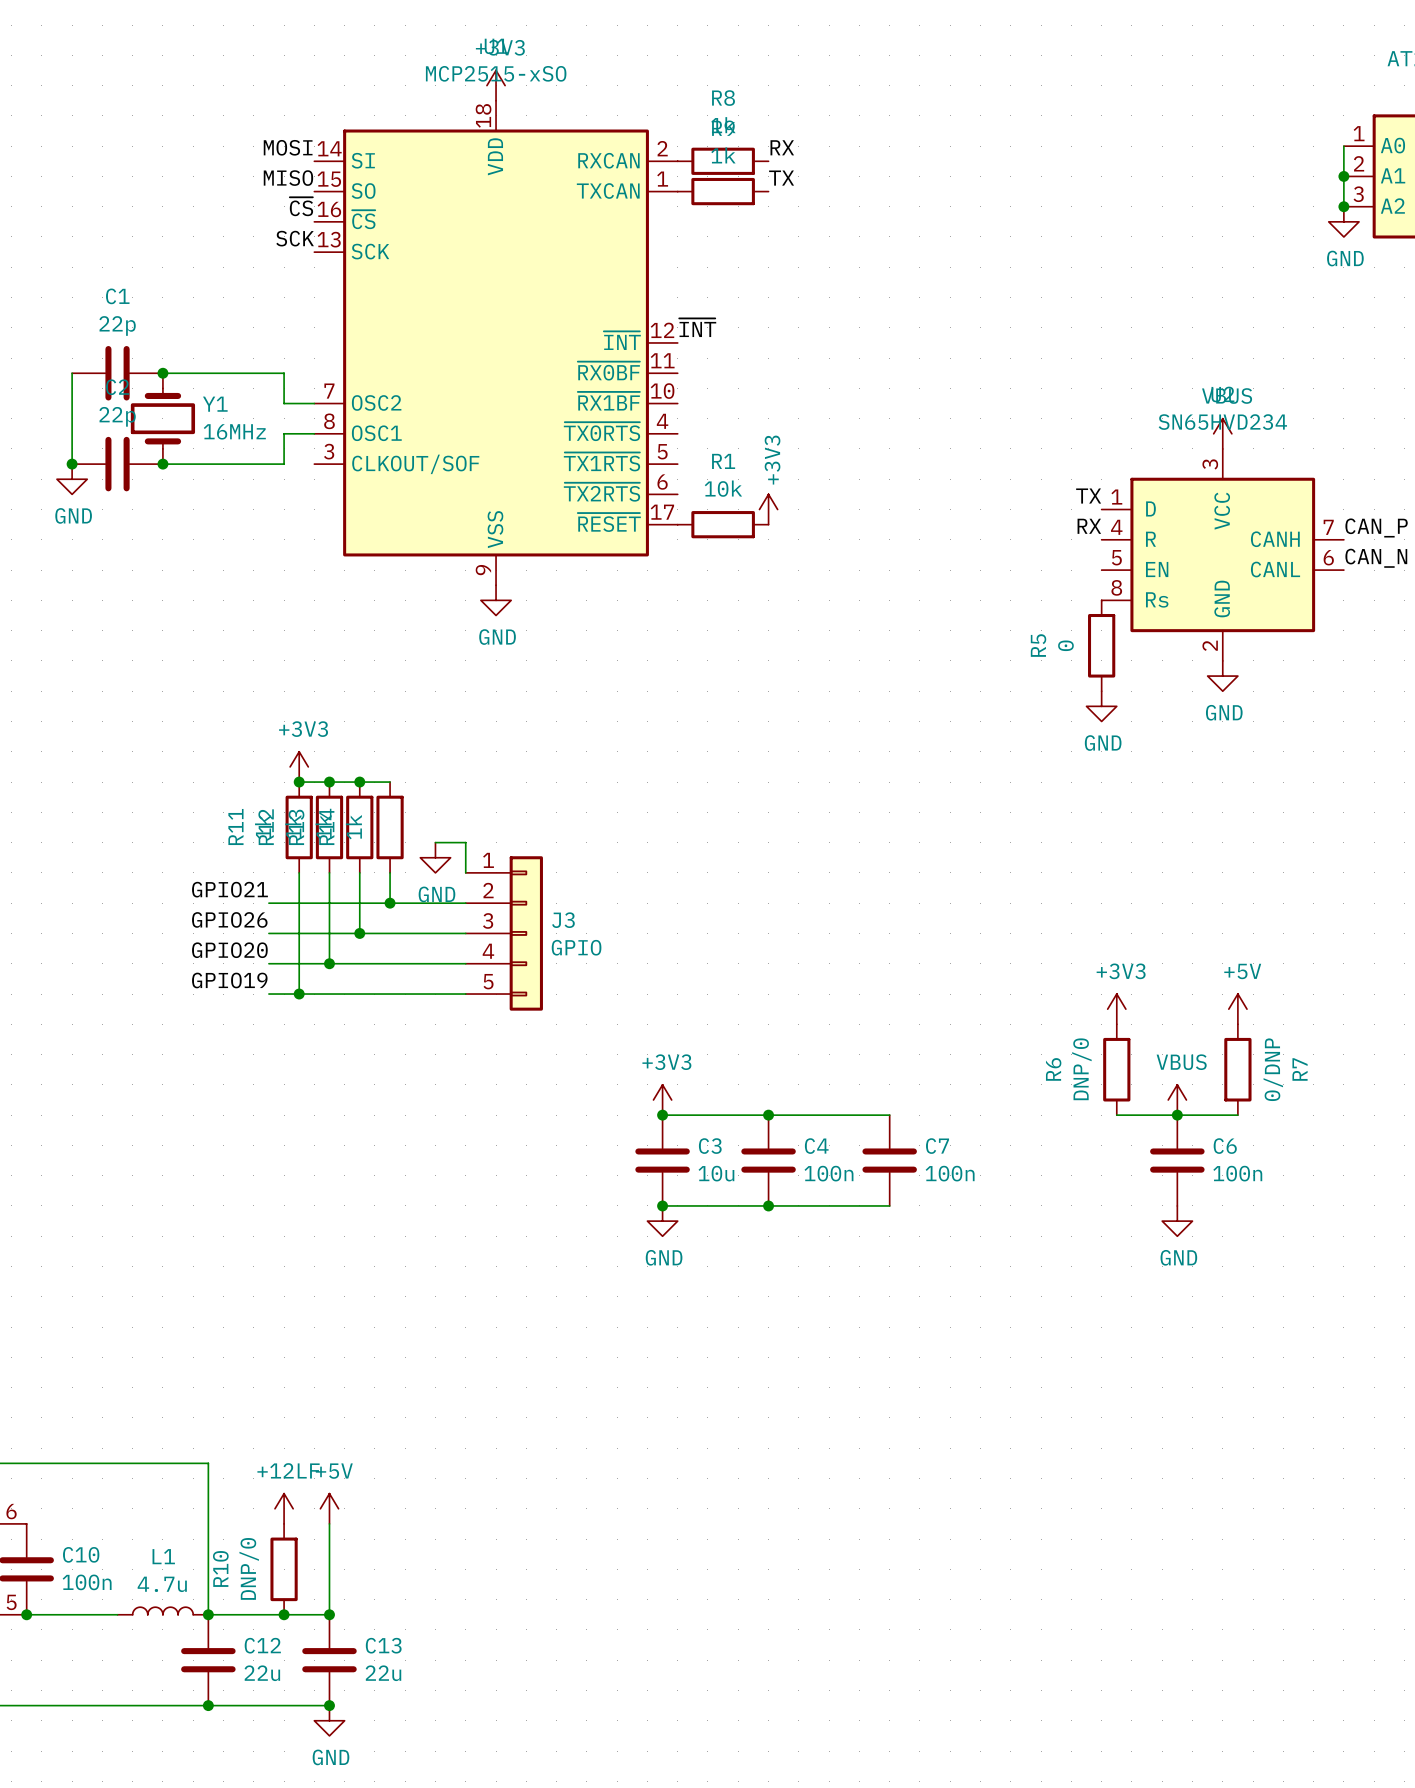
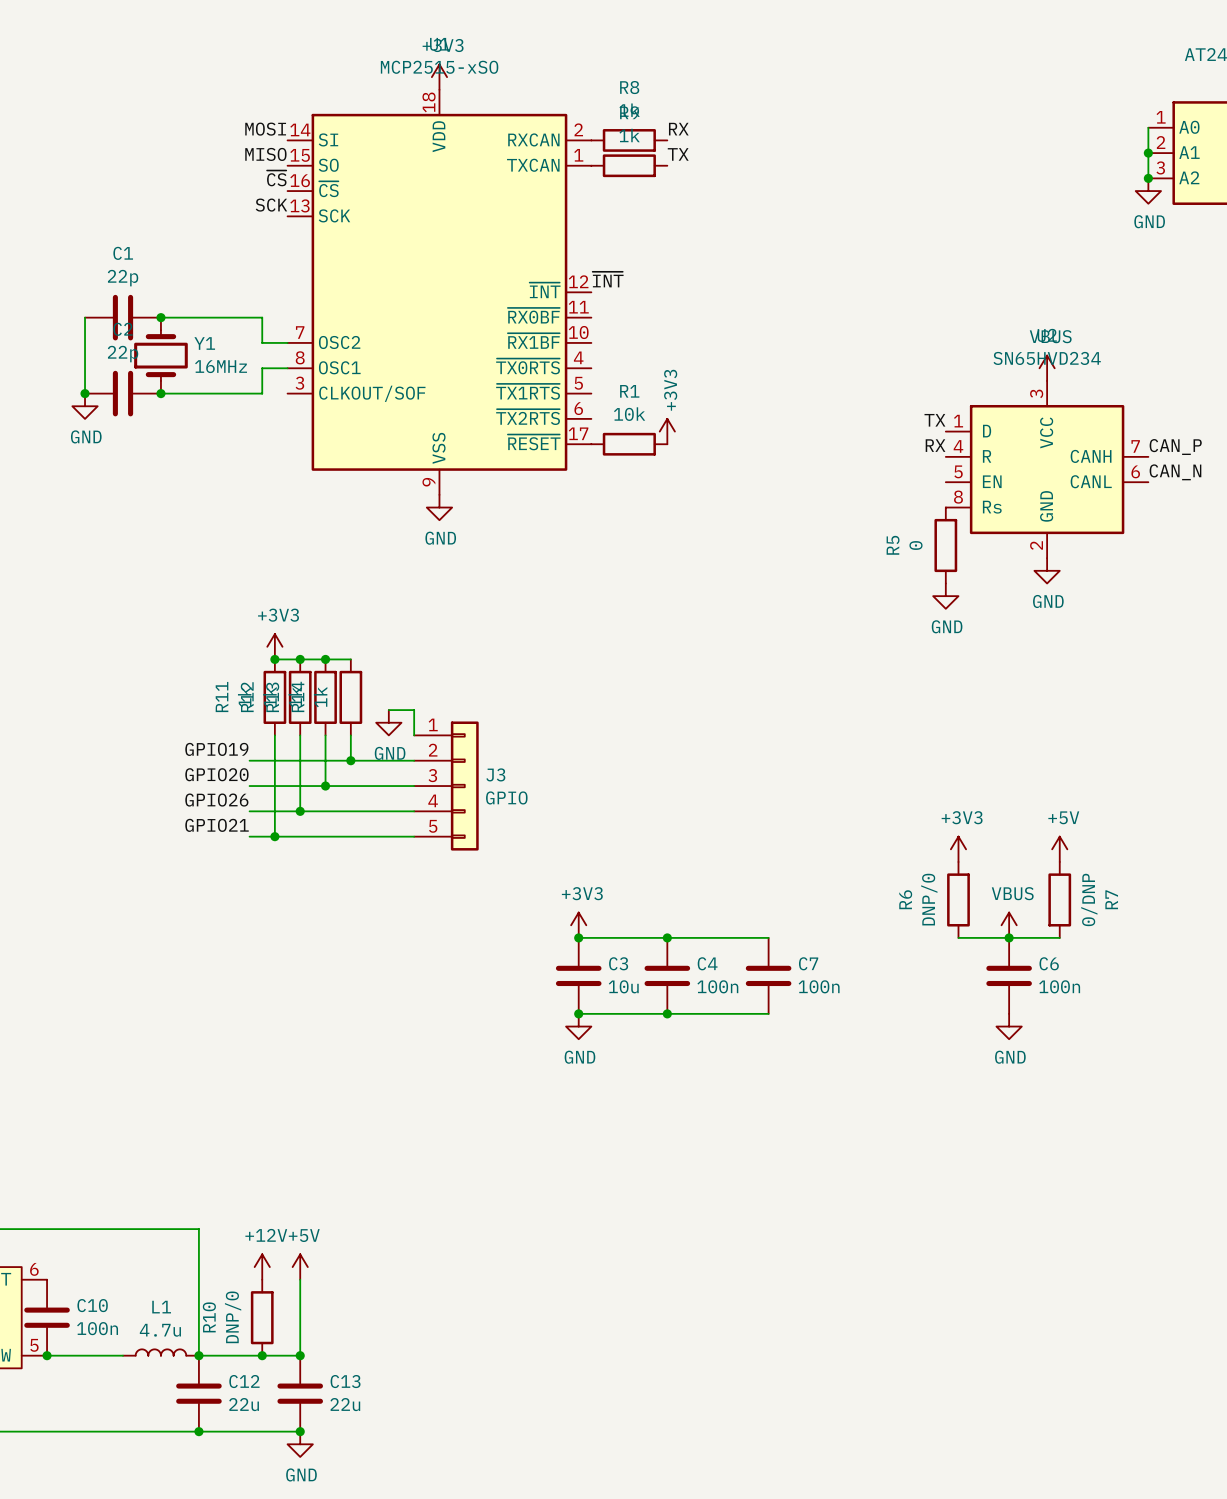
label: GPIO21 (229, 889) -> GPIO19 (216, 749)
label: GPIO26 (229, 919) -> GPIO20 (216, 774)
label: GPIO20 (229, 950) -> GPIO26 (216, 800)
label: GPIO19 (229, 980) -> GPIO21 (217, 825)
power symbol: +12LF (284, 1508) -> +12V (262, 1267)

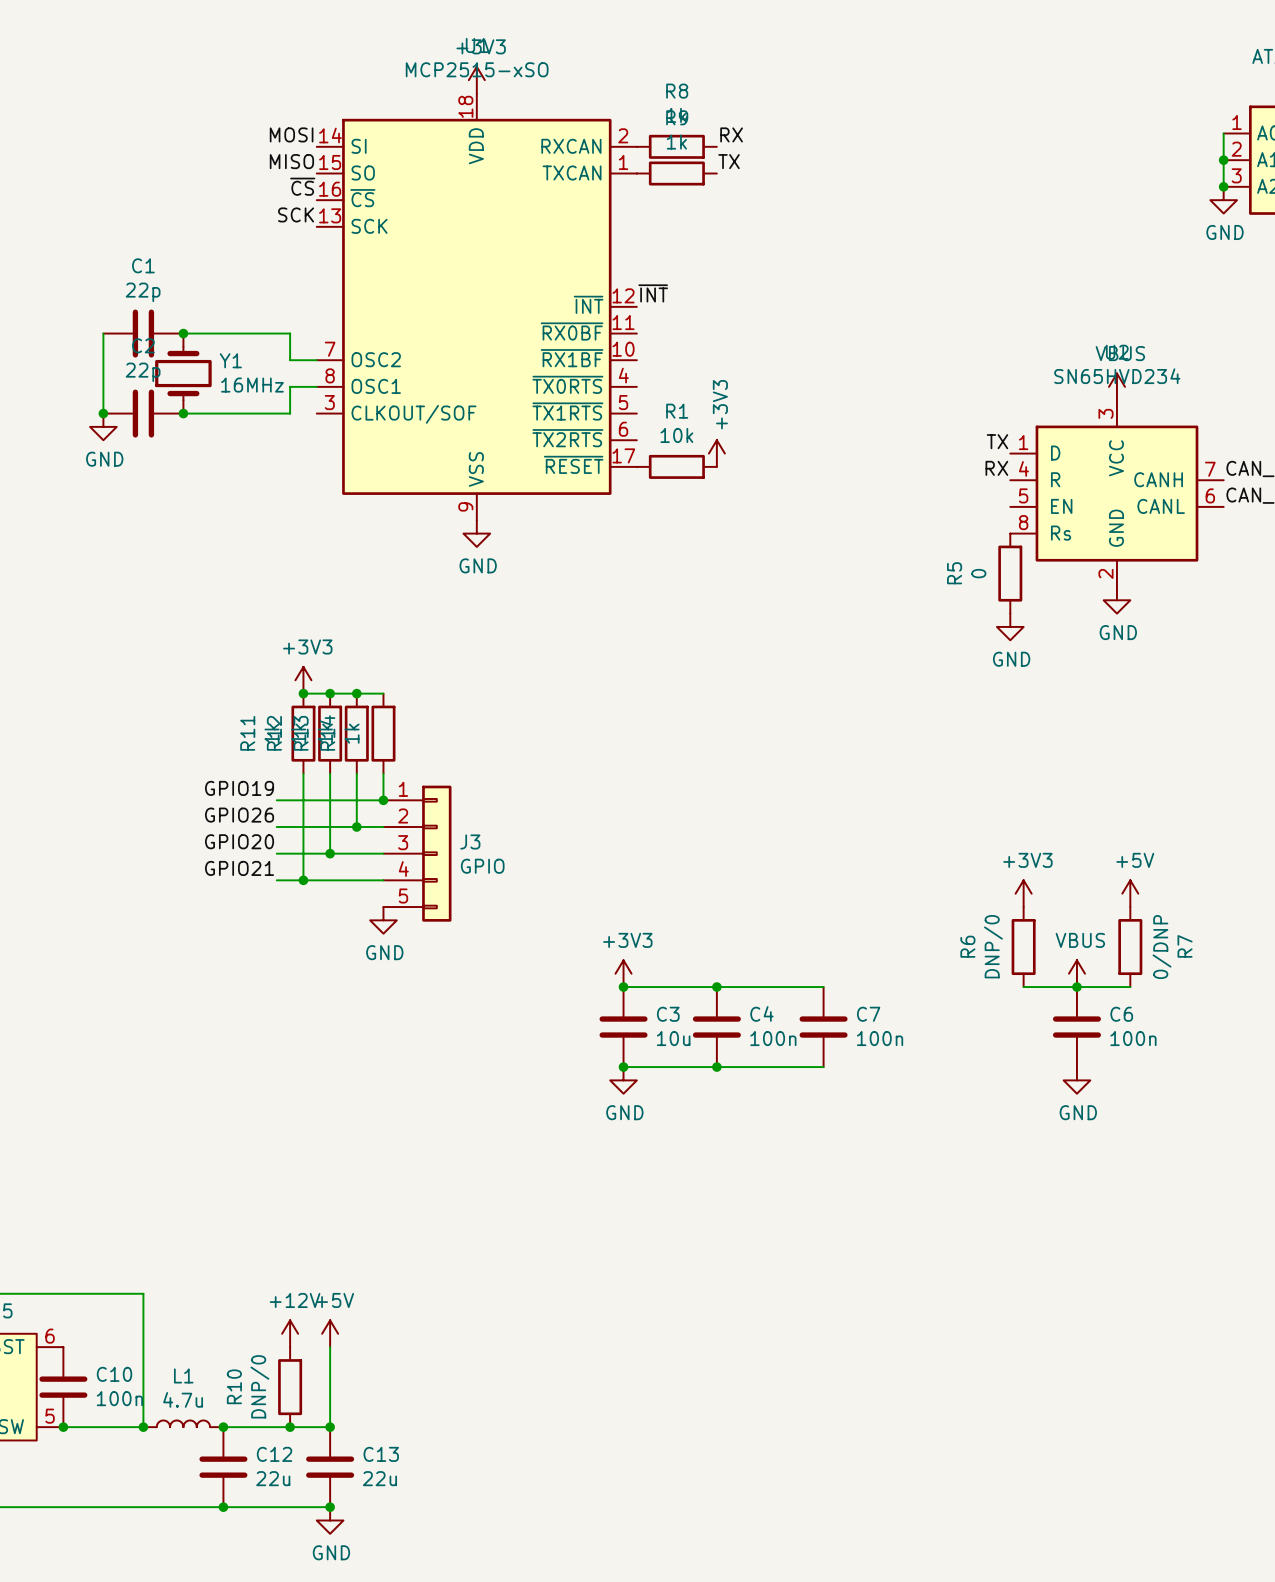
wire: (388, 710) (414, 710) (414, 735) -> none
power symbol position: GND (388, 722) -> GND (383, 920)
label: GPIO20 (216, 774) -> GPIO26 (239, 815)
J3 position: (446, 786) -> (417, 853)
label: GPIO26 (216, 800) -> GPIO20 (239, 841)
wire: (122, 1229) (198, 1229) (198, 1355) -> (143, 1293) (143, 1427)
junction: none -> (143, 1427)

